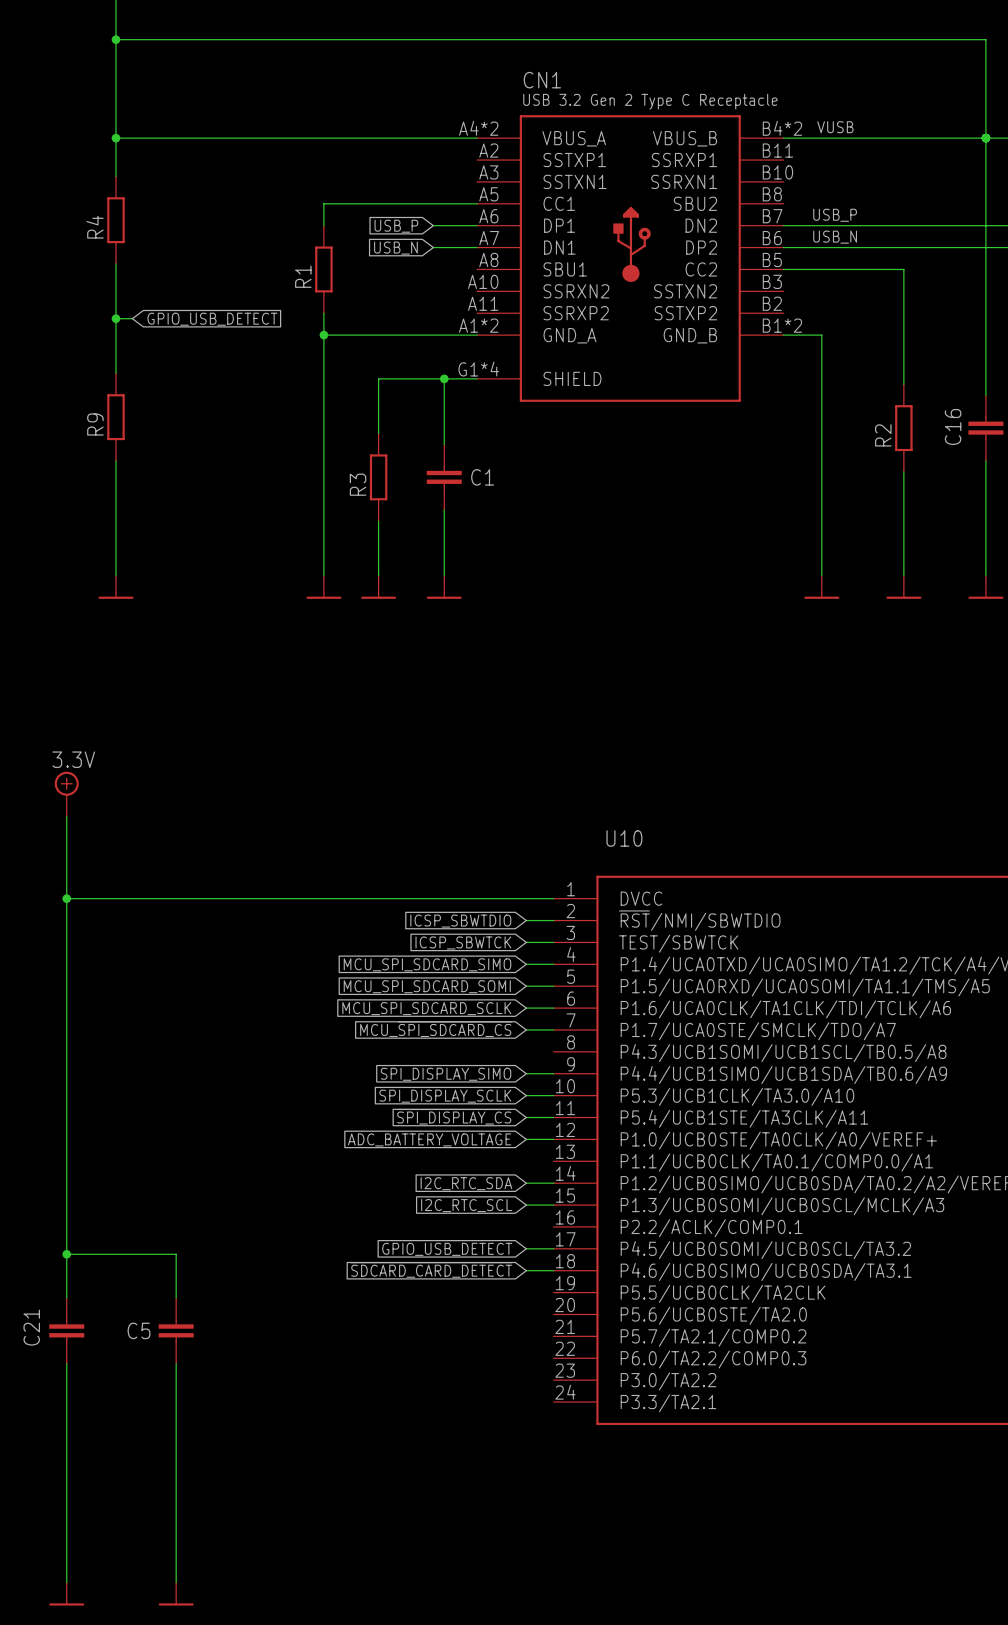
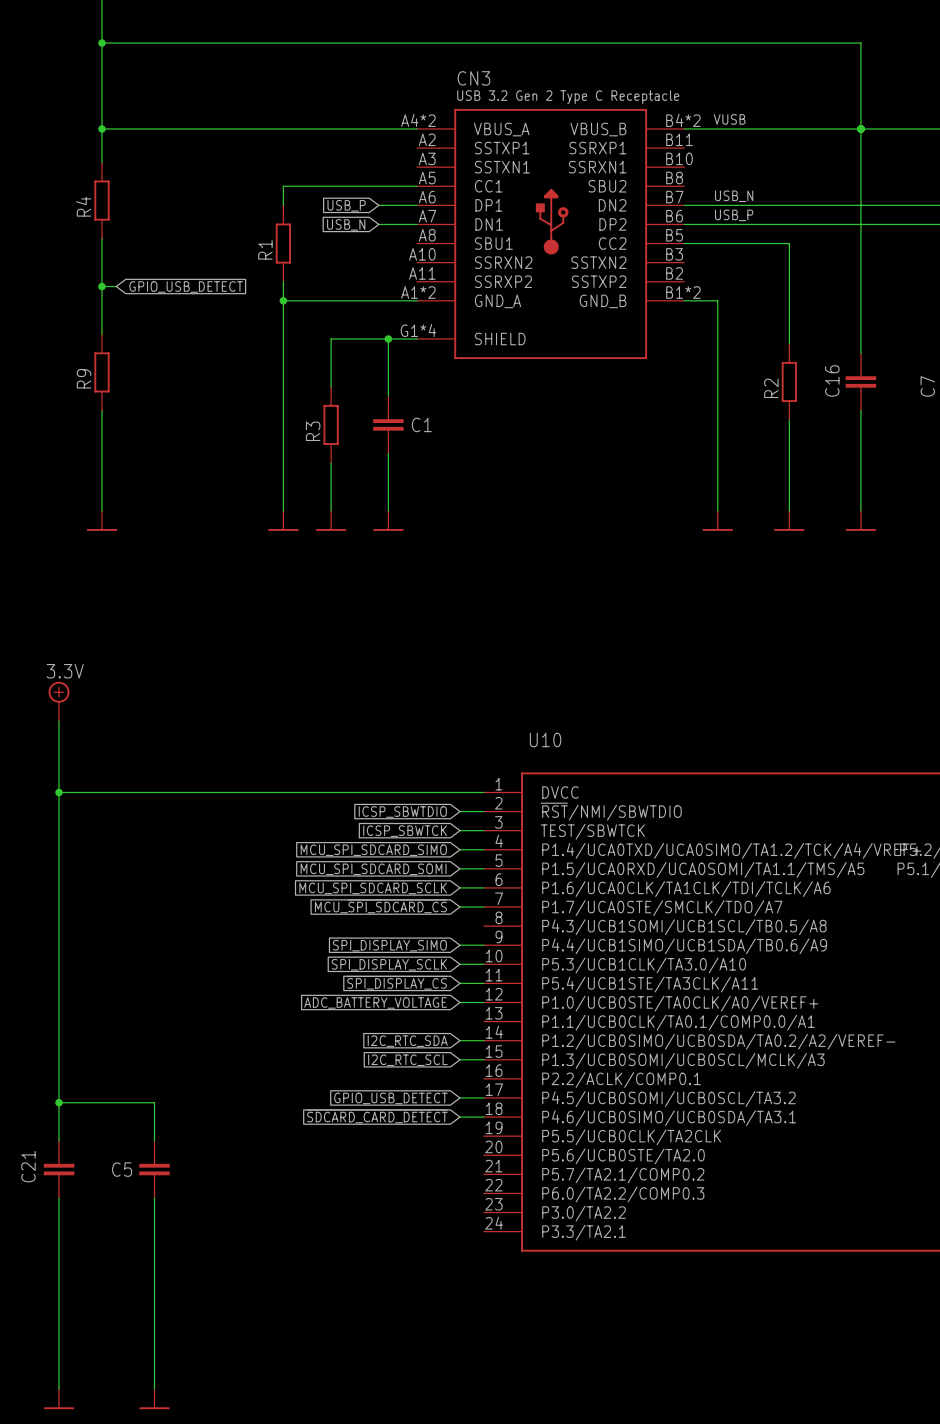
CN1 name: CN1 (542, 80) -> CN3 (473, 78)
label: USB_P (835, 215) -> USB_N (734, 196)
label: USB_N (835, 237) -> USB_P (734, 215)

